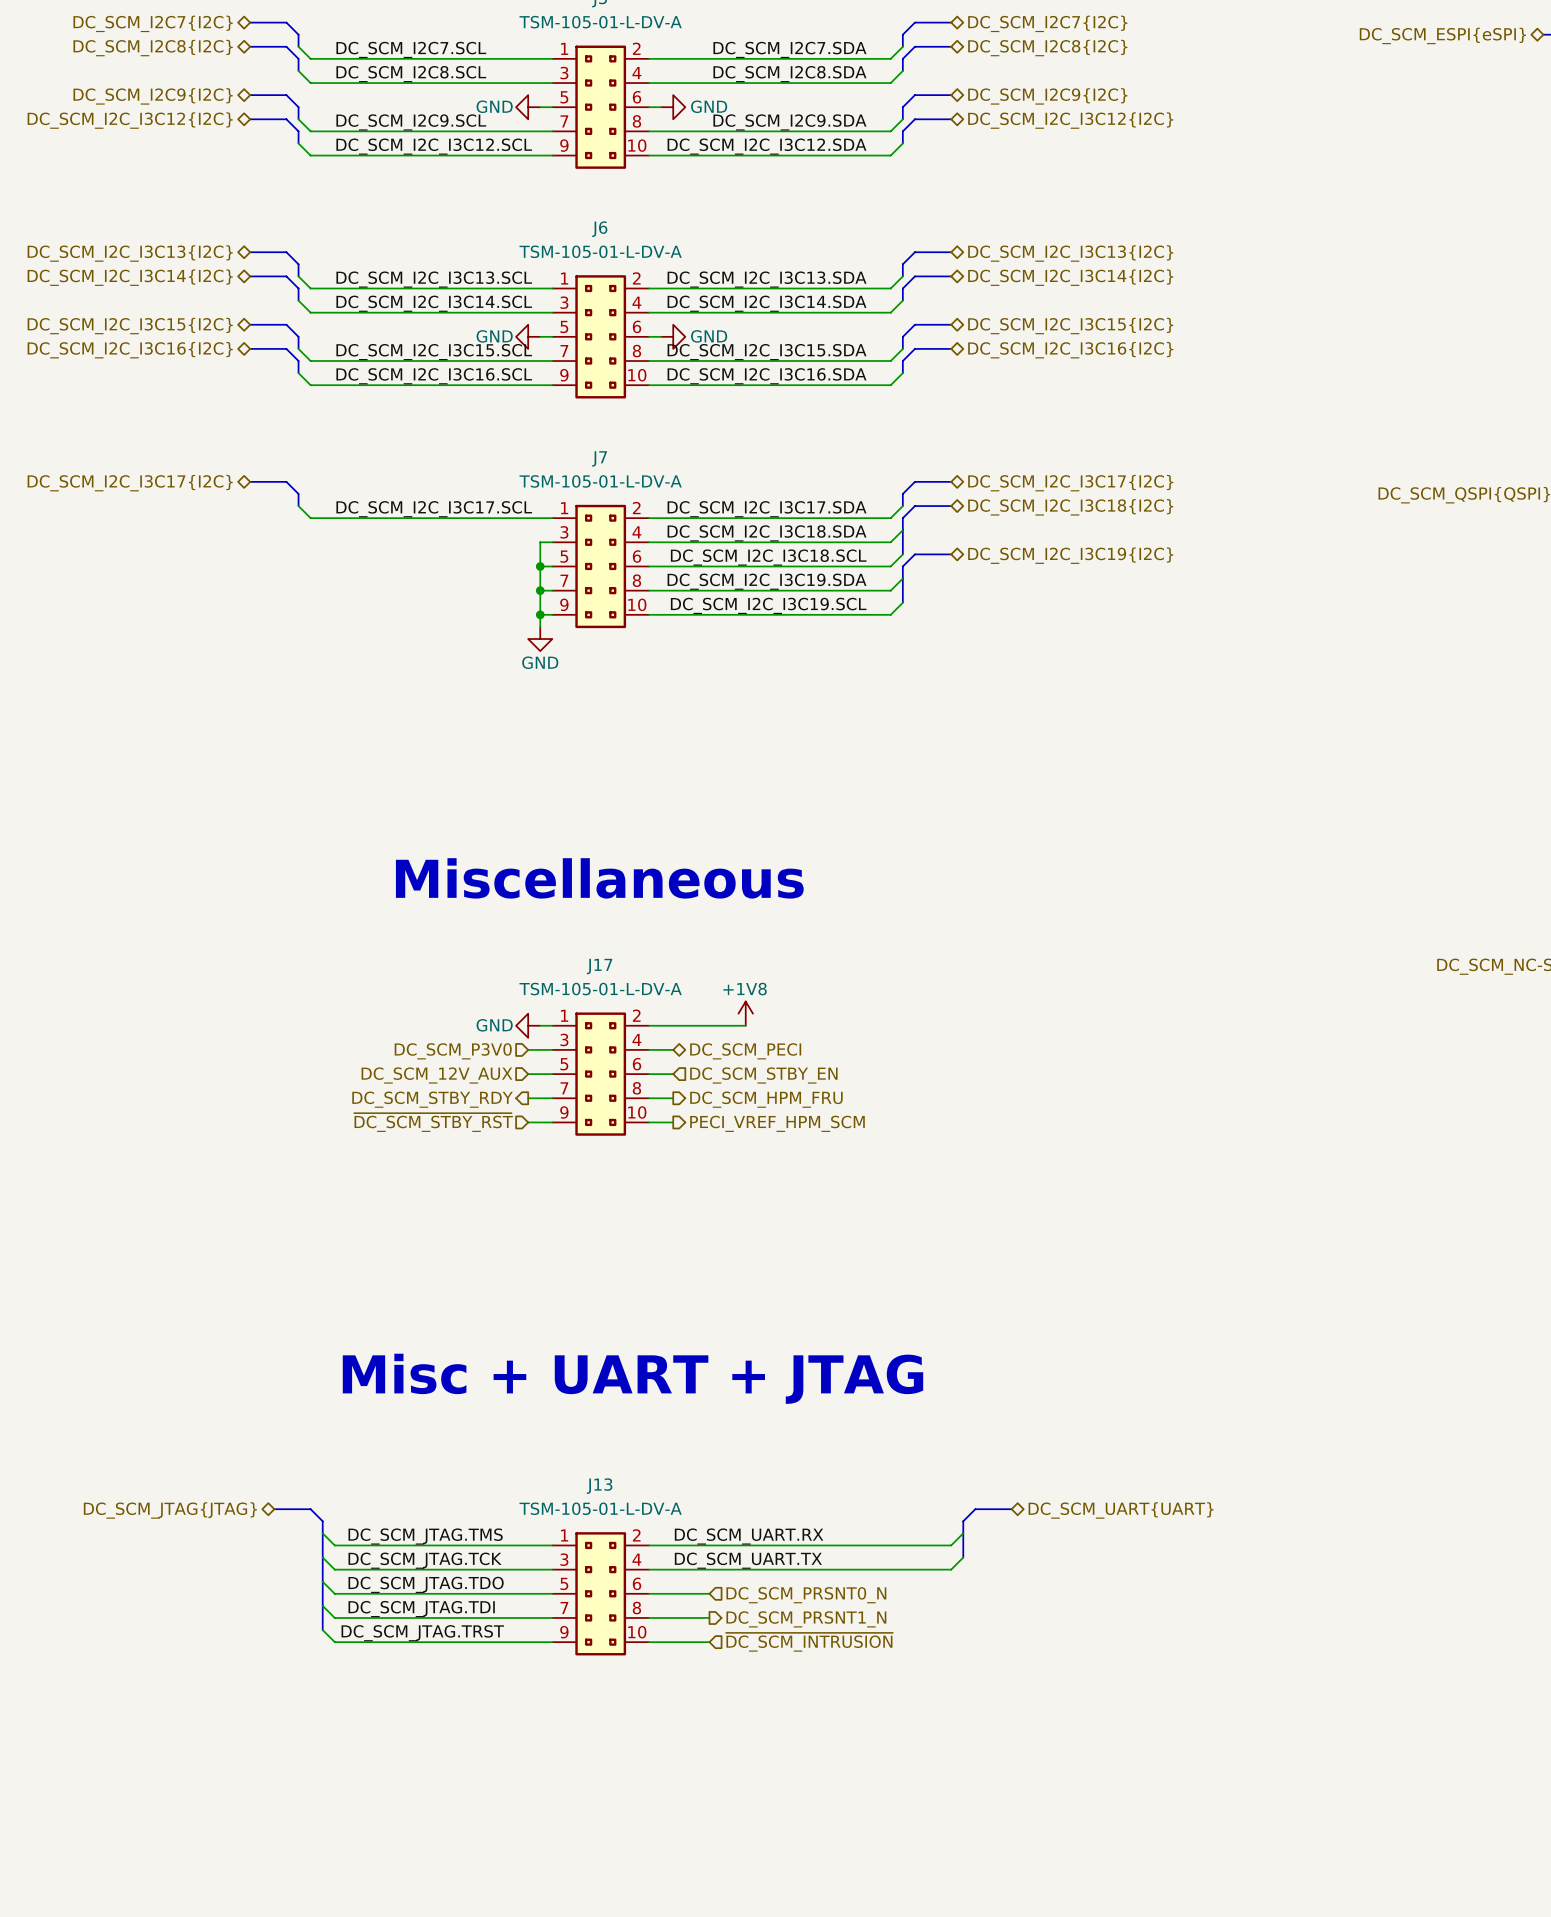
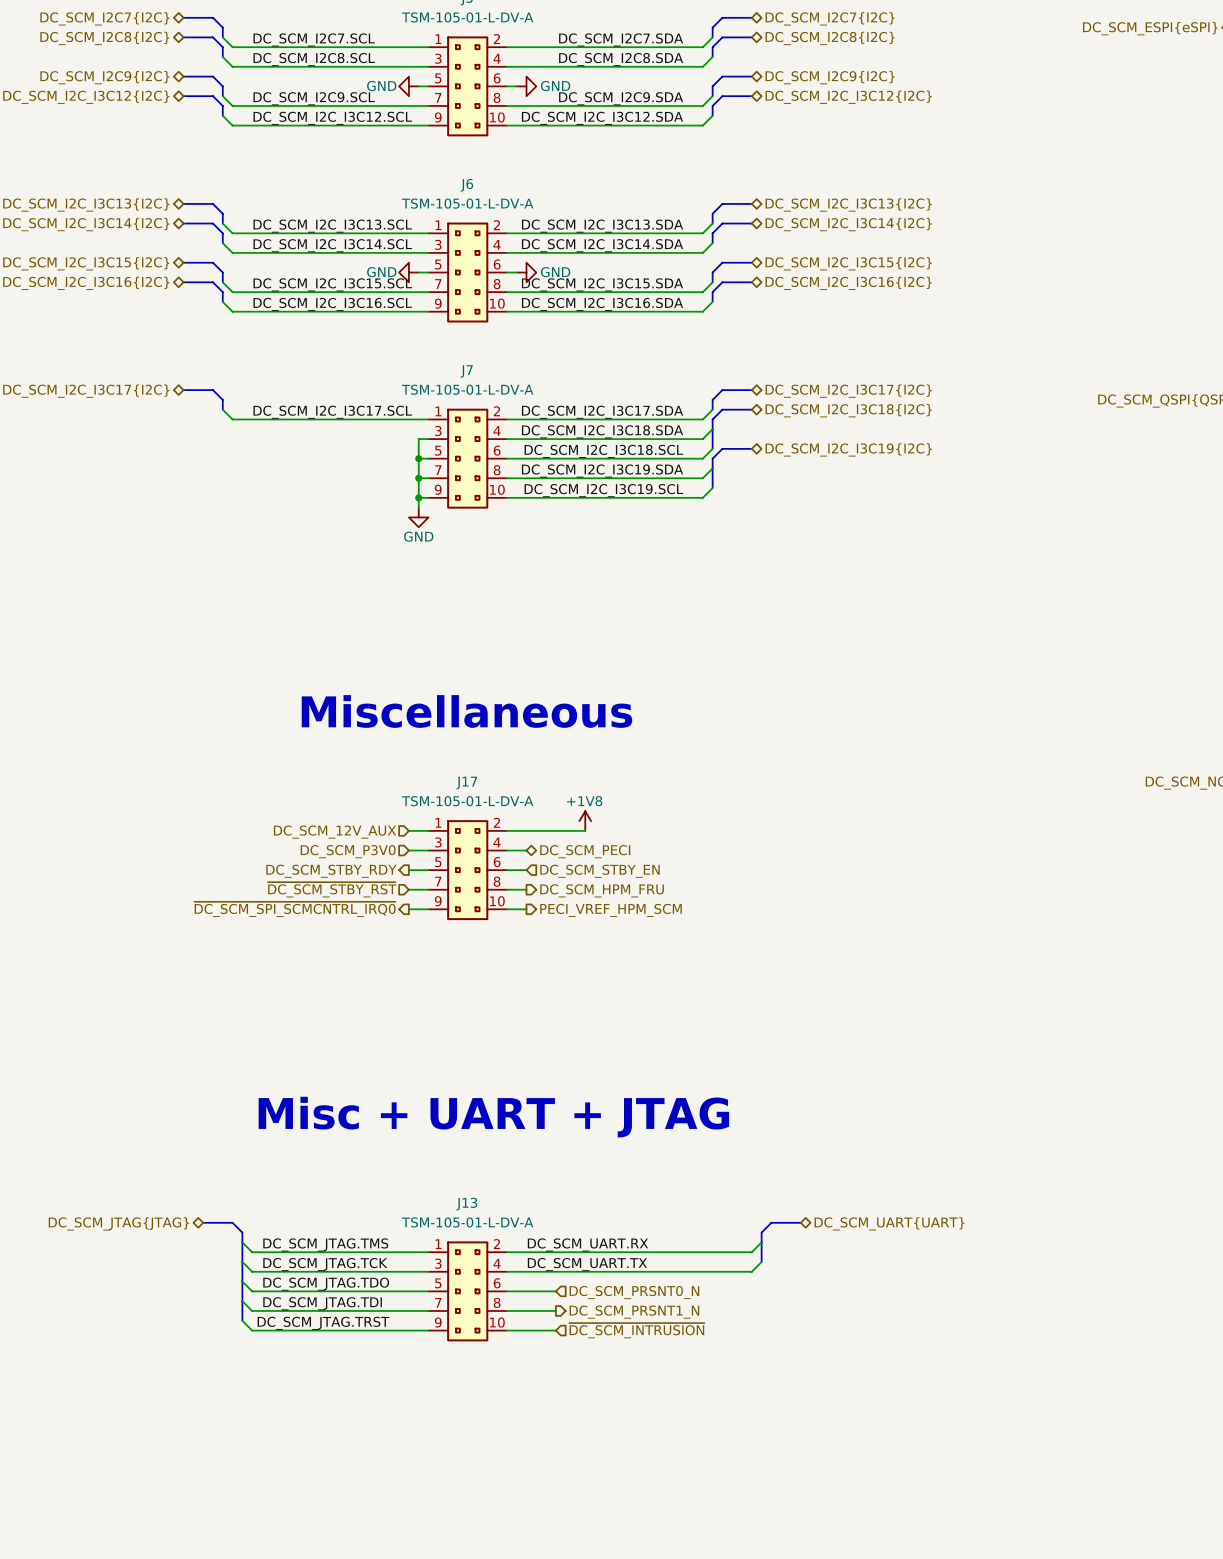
power symbol: GND (528, 1025) -> none
hierarchical label: none -> DC_SCM_12V_AUX (334, 832)
hierarchical label shape: input (436, 1075) -> output (331, 871)
hierarchical label: DC_SCM_12V_AUX (436, 1075) -> DC_SCM_STBY_RDY (331, 871)
hierarchical label shape: output (432, 1099) -> input (332, 889)
hierarchical label: DC_SCM_STBY_RDY (432, 1099) -> ~{DC_SCM_STBY_RST} (332, 889)
hierarchical label shape: input (433, 1122) -> output (294, 909)
hierarchical label: ~{DC_SCM_STBY_RST} (433, 1122) -> ~{DC_SCM_SPI_SCMCNTRL_IRQ0} (294, 909)

